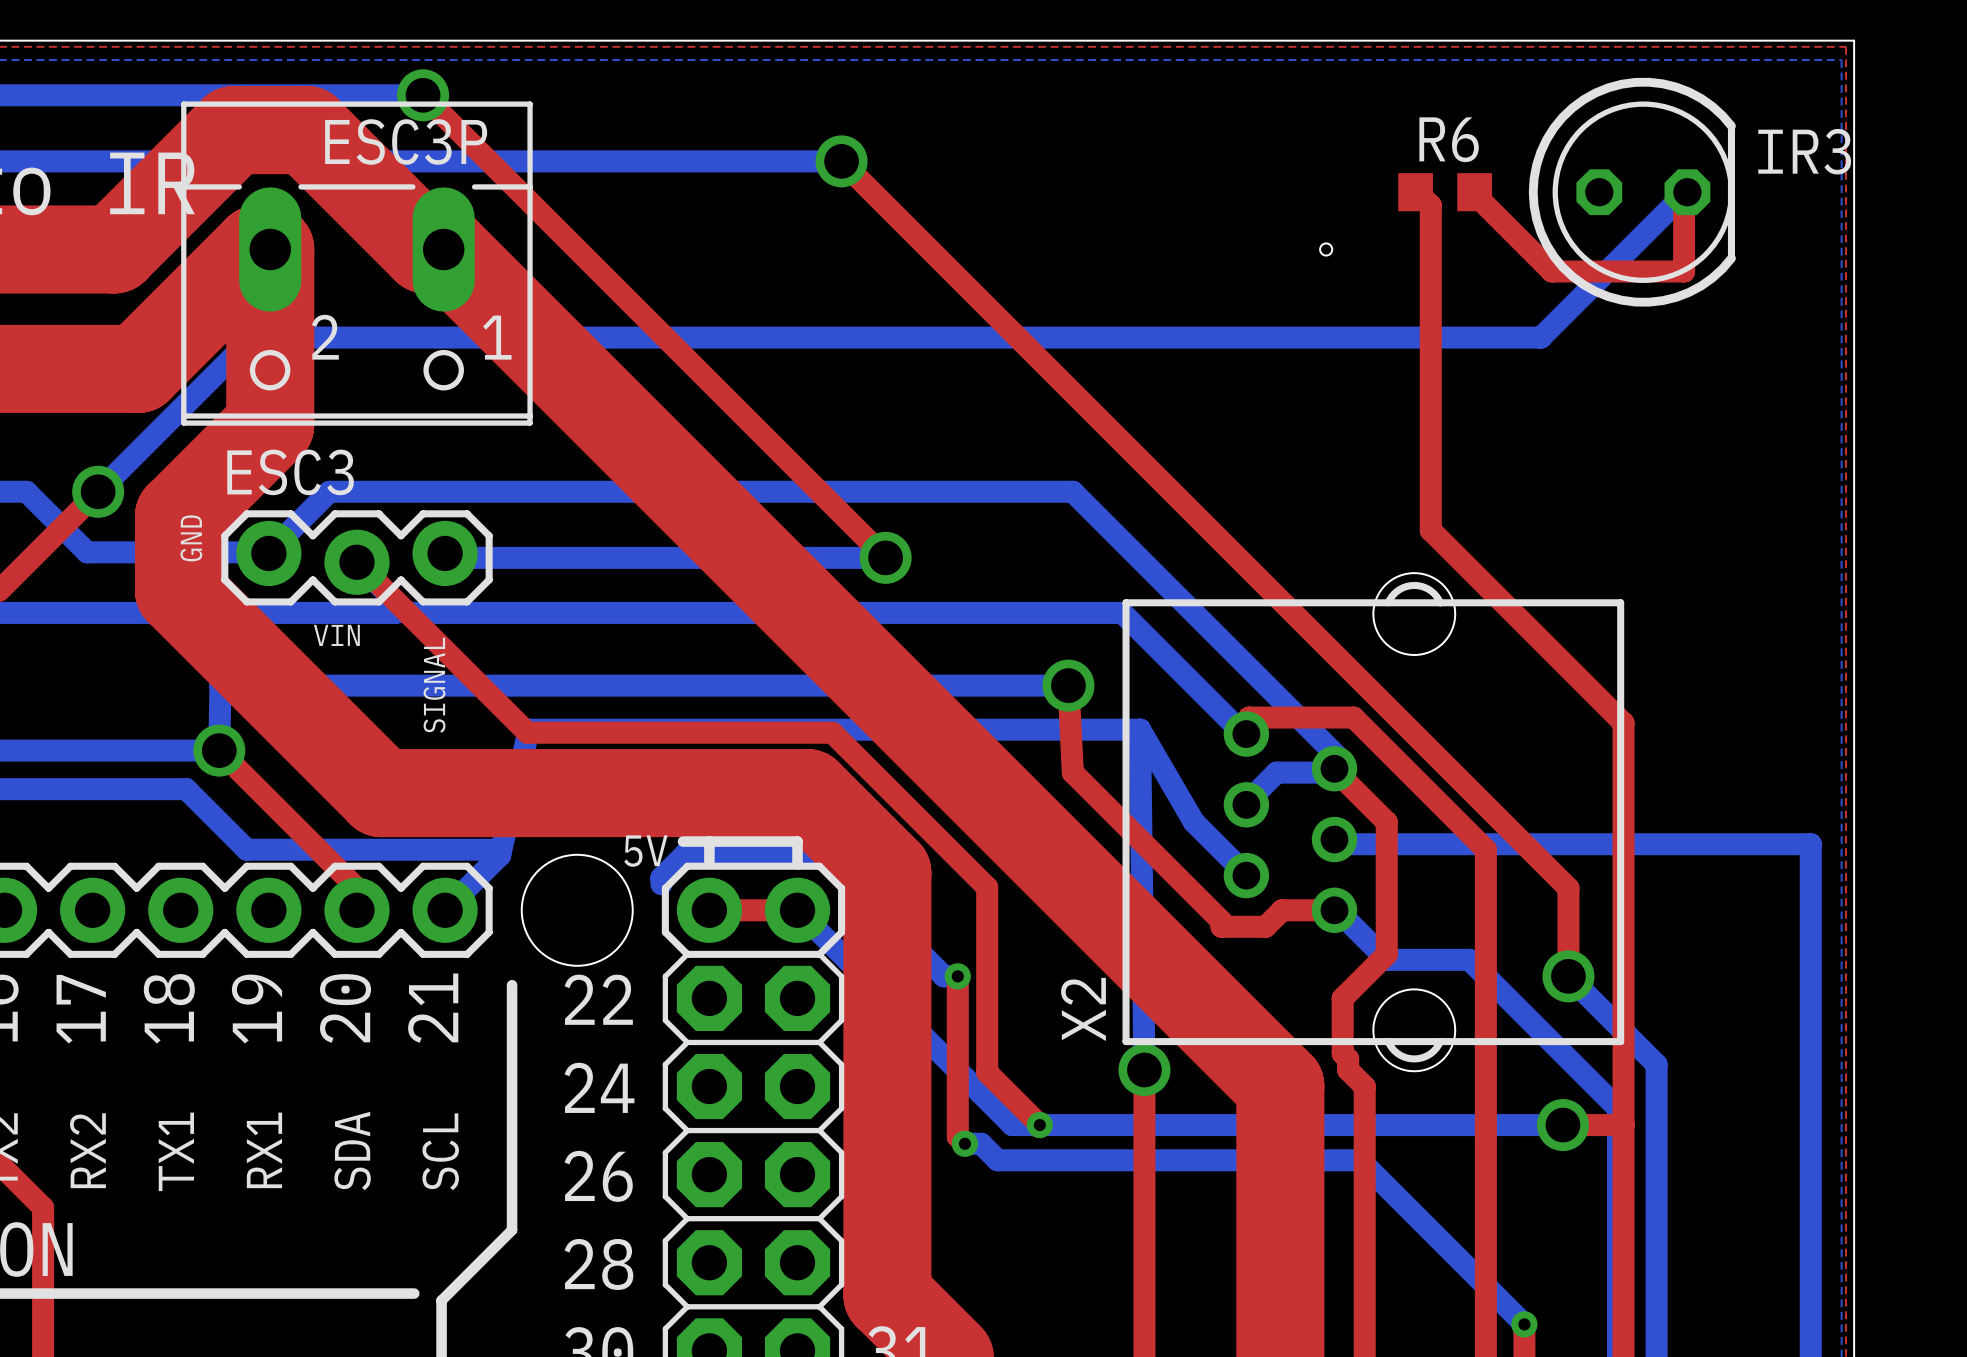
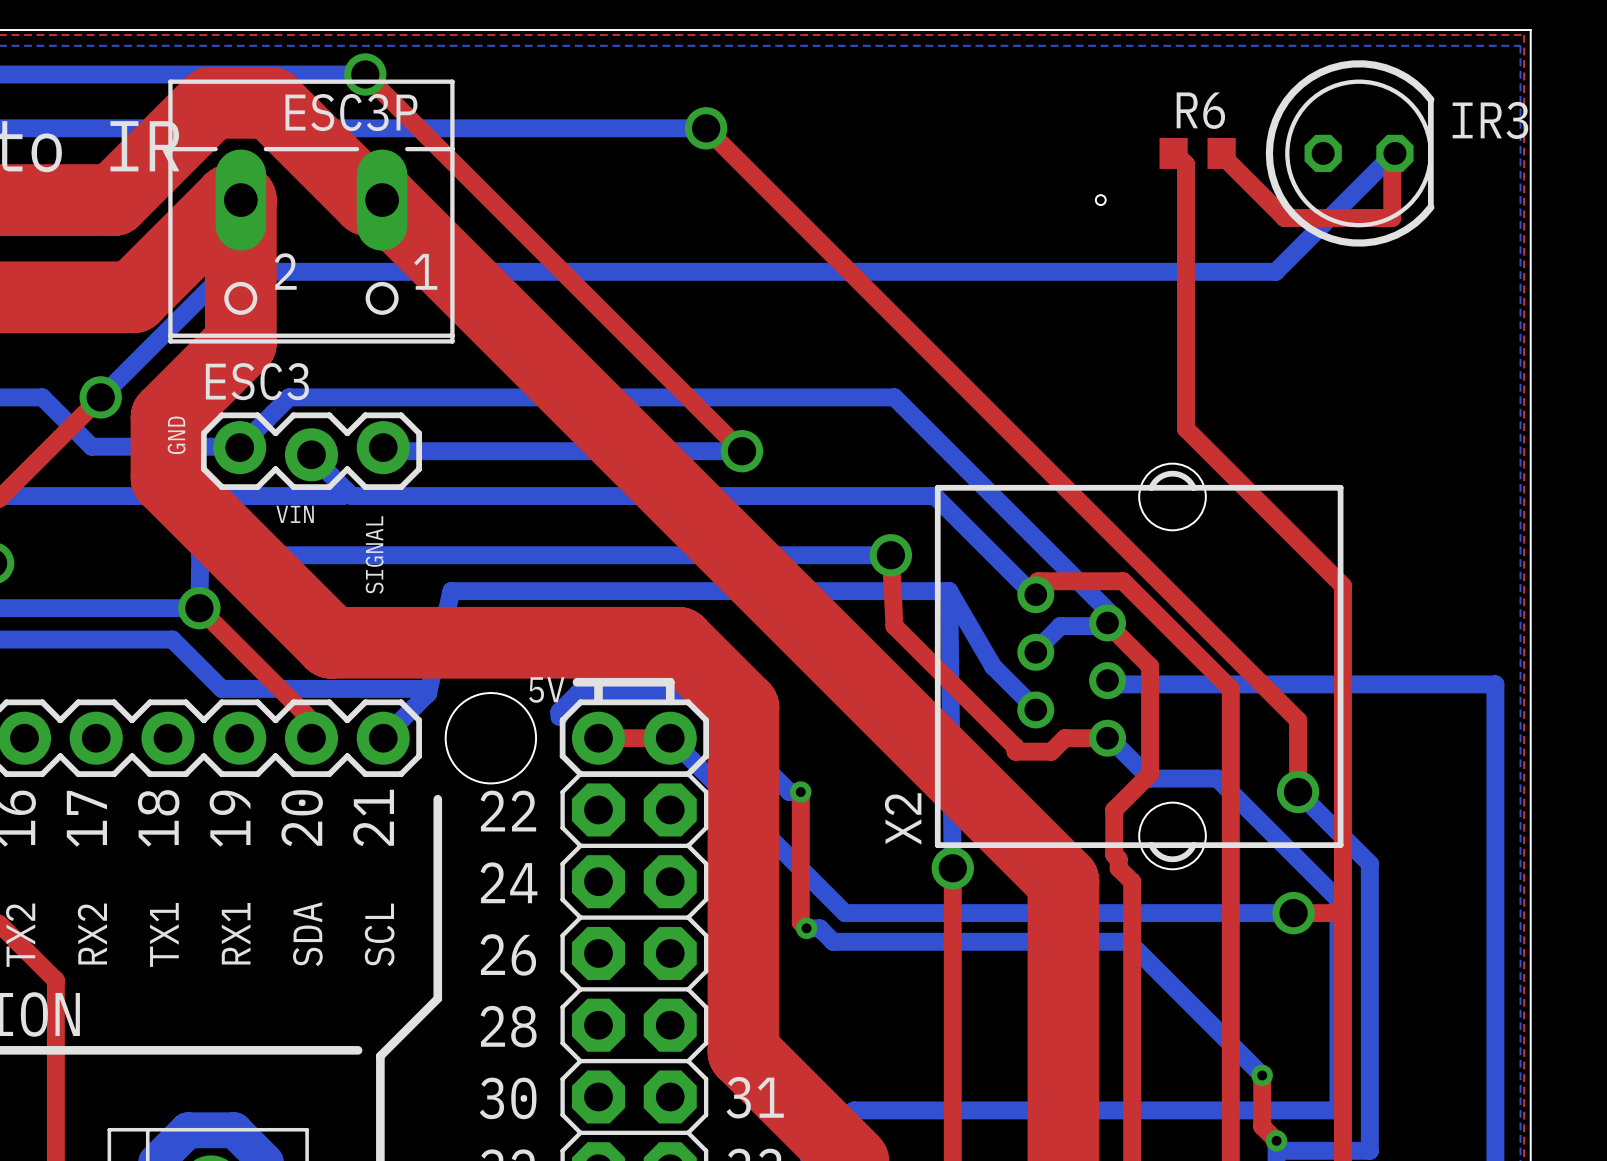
top track: (356, 562) (527, 732) (832, 732) (987, 887) (987, 1072) (1039, 1125) -> none
via: (1039, 1125) -> none

